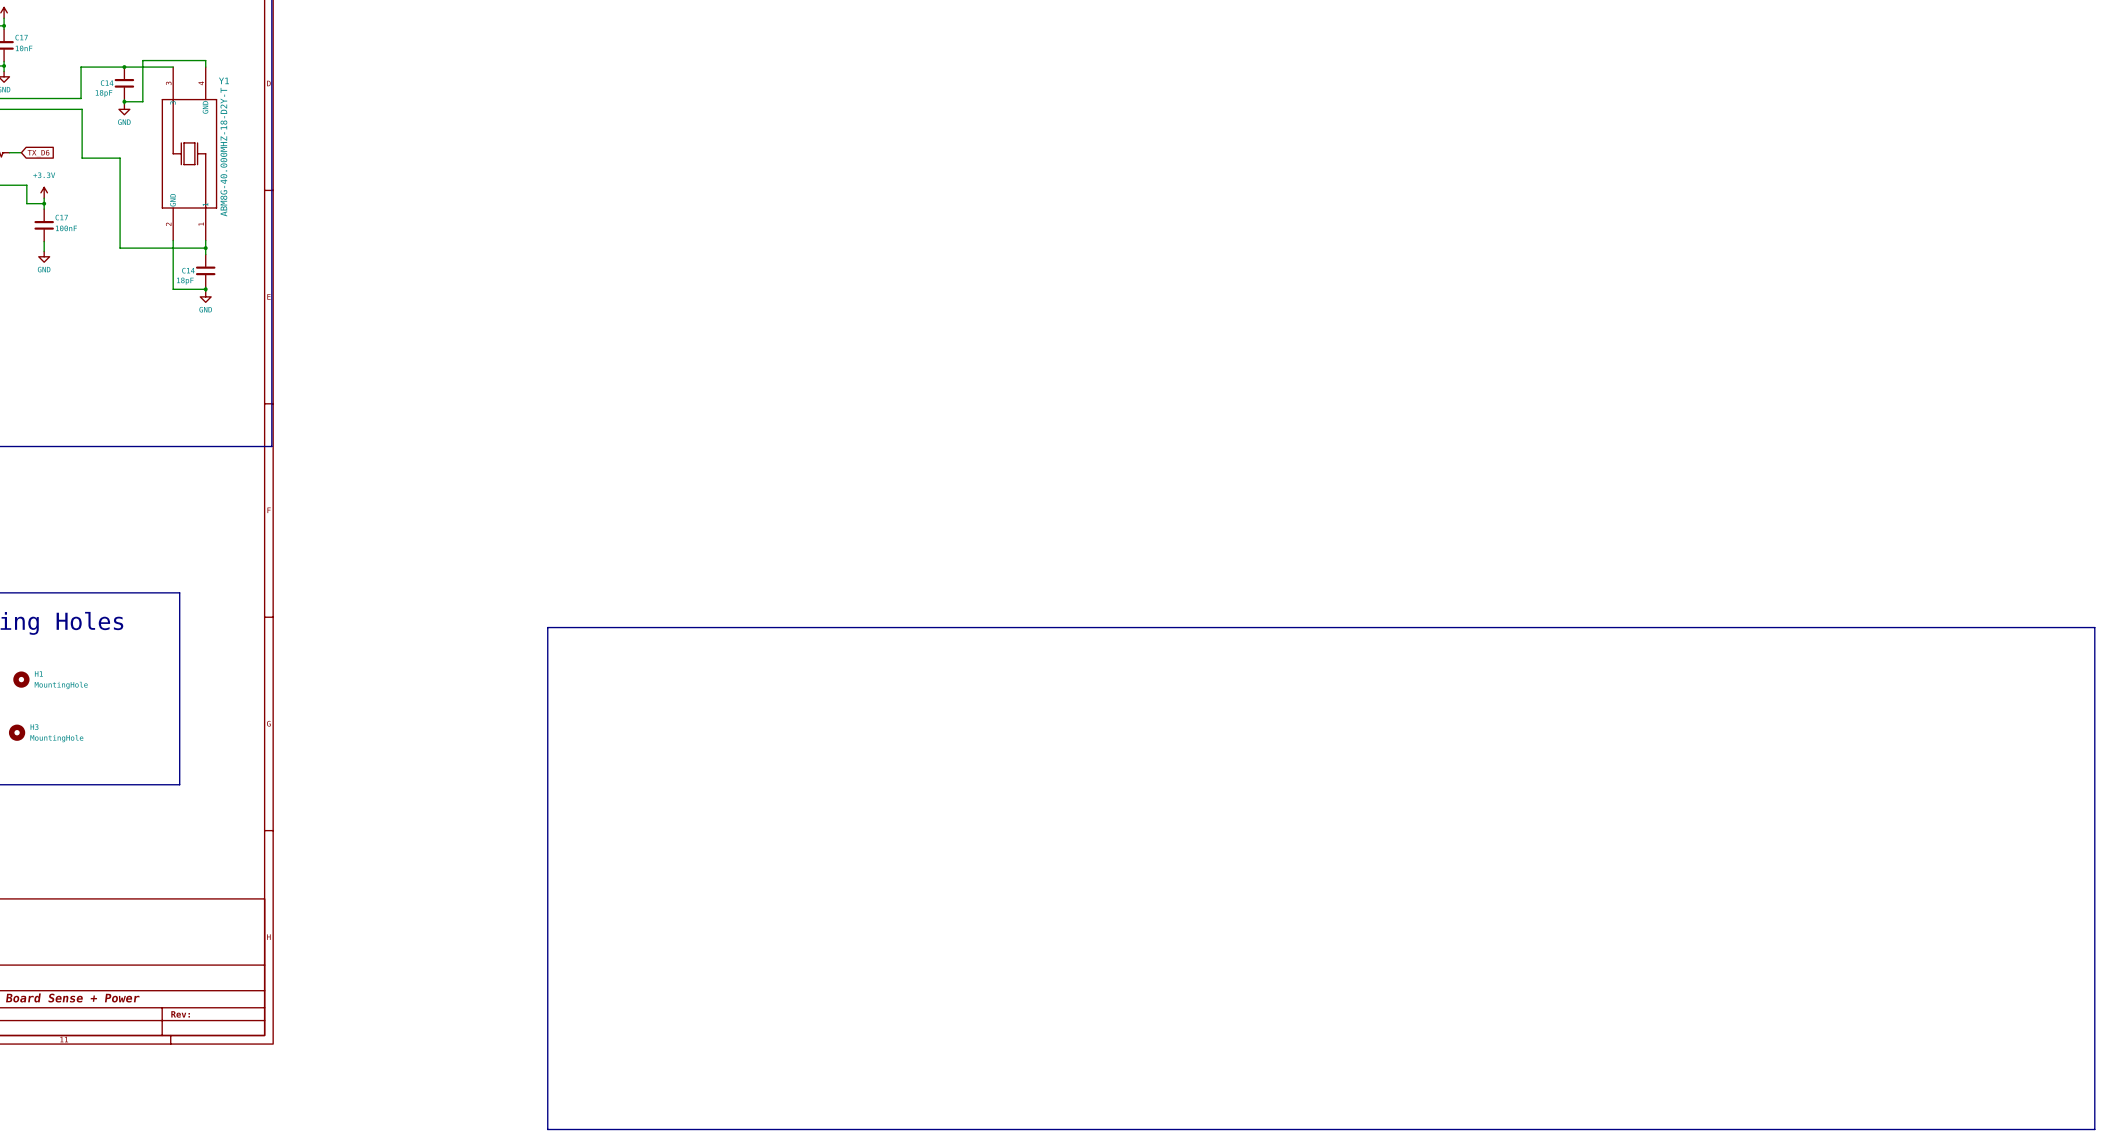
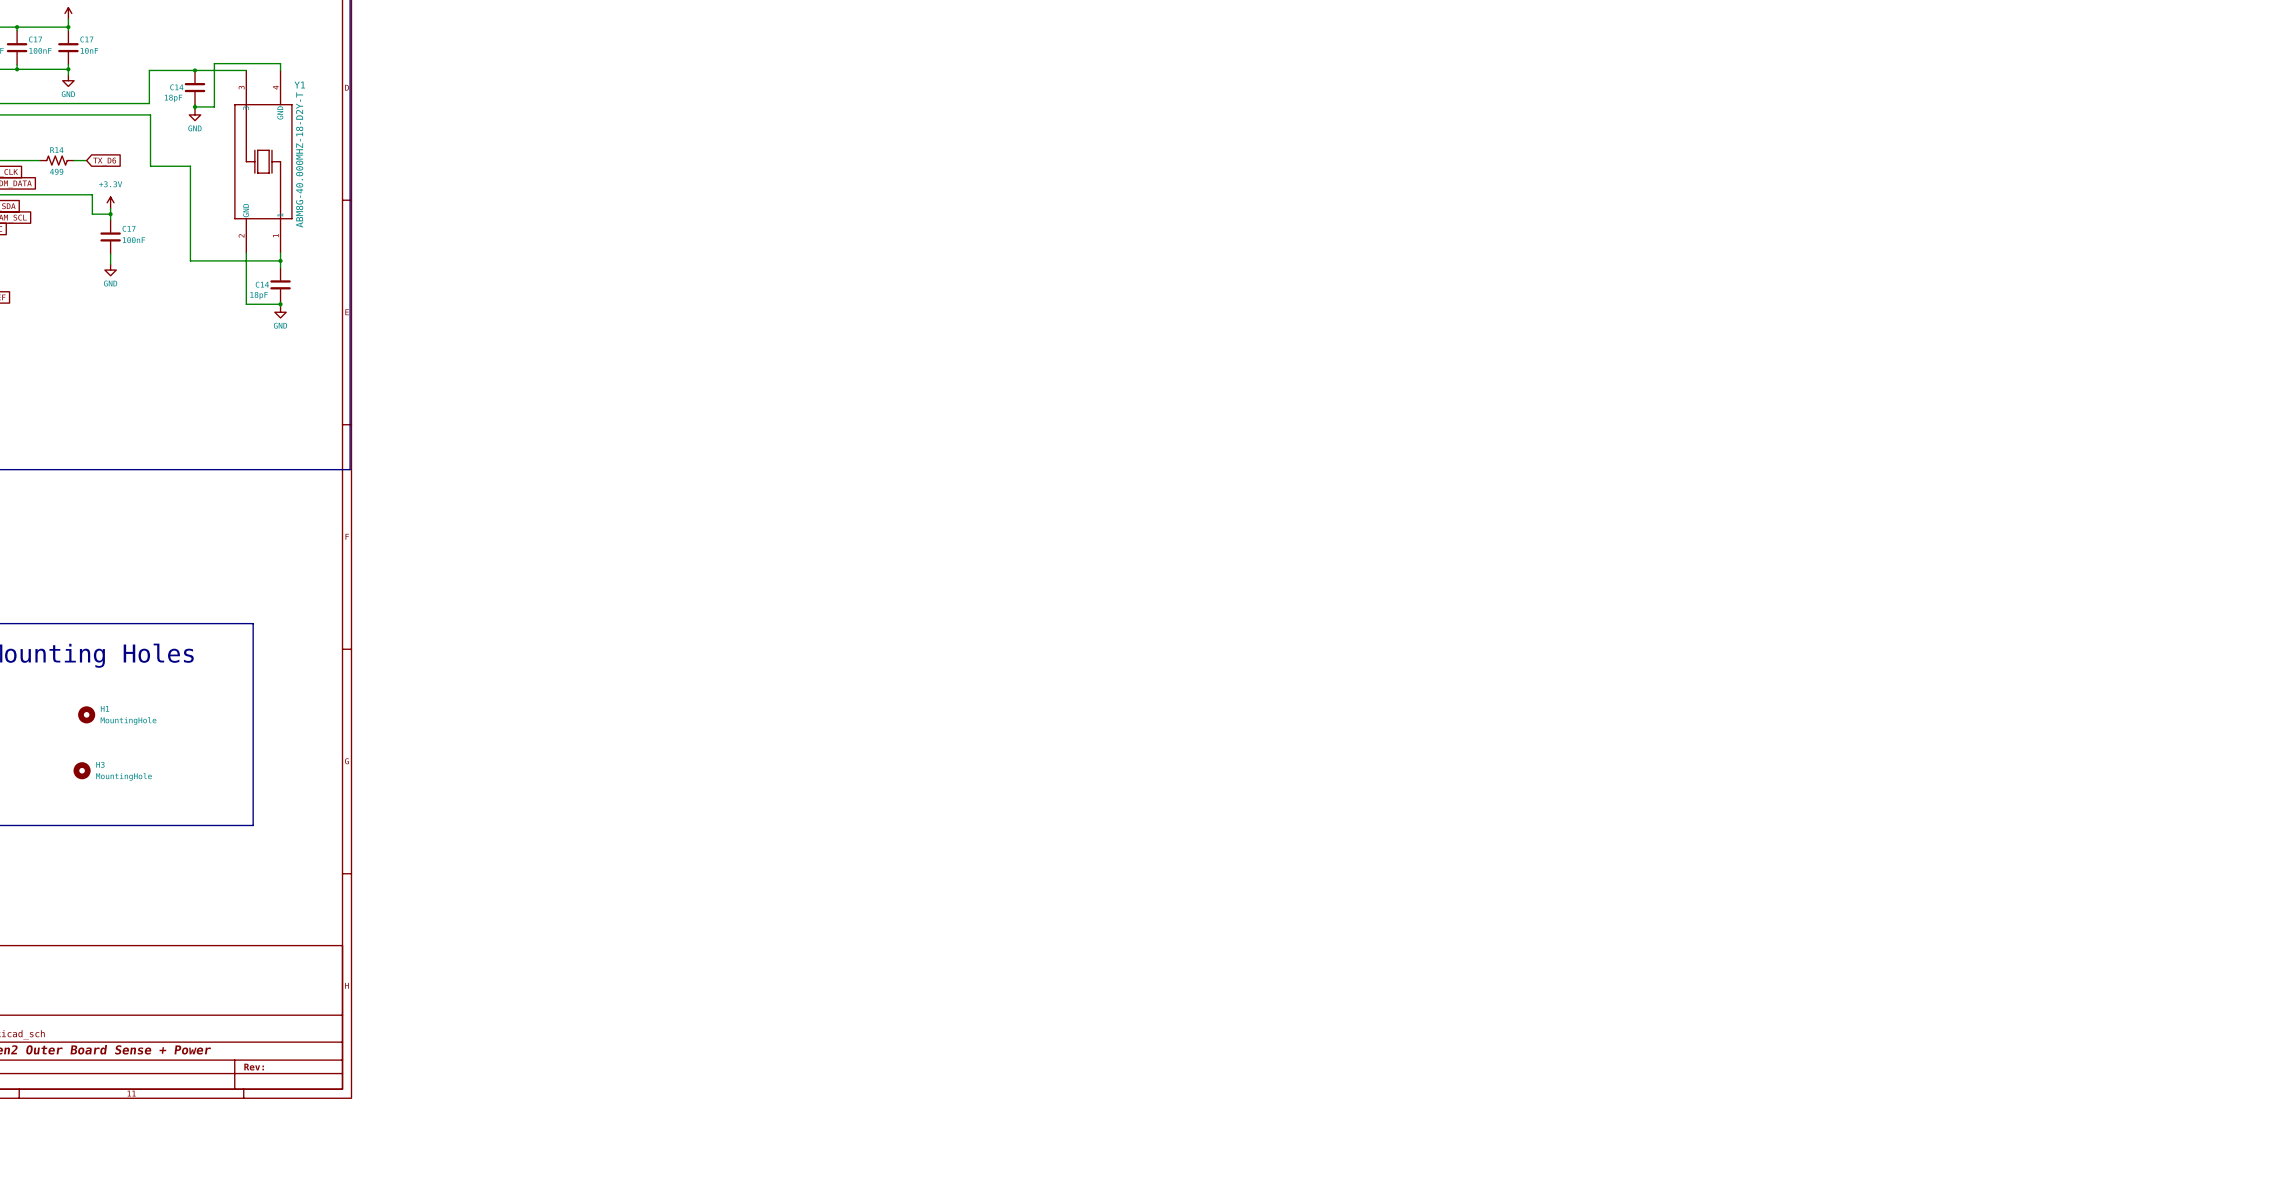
line: (547, 627) (2094, 627) (2094, 1129) (547, 1129) (547, 627) -> none

